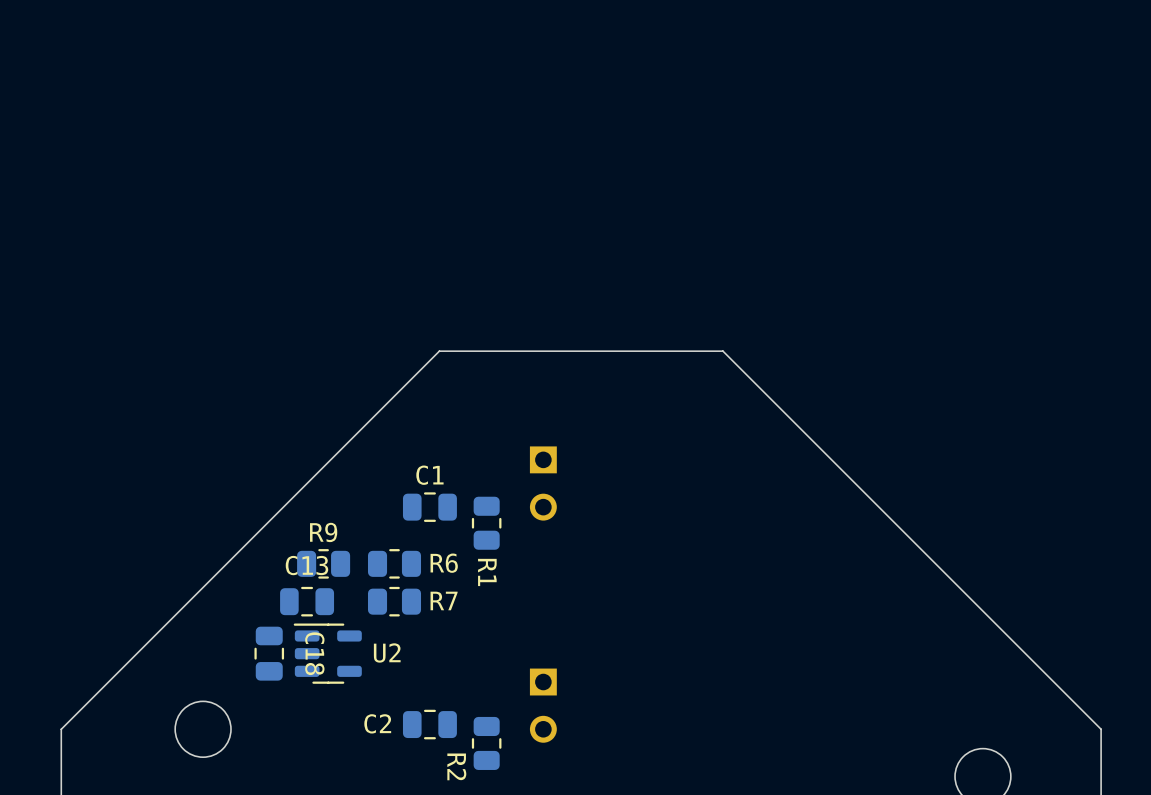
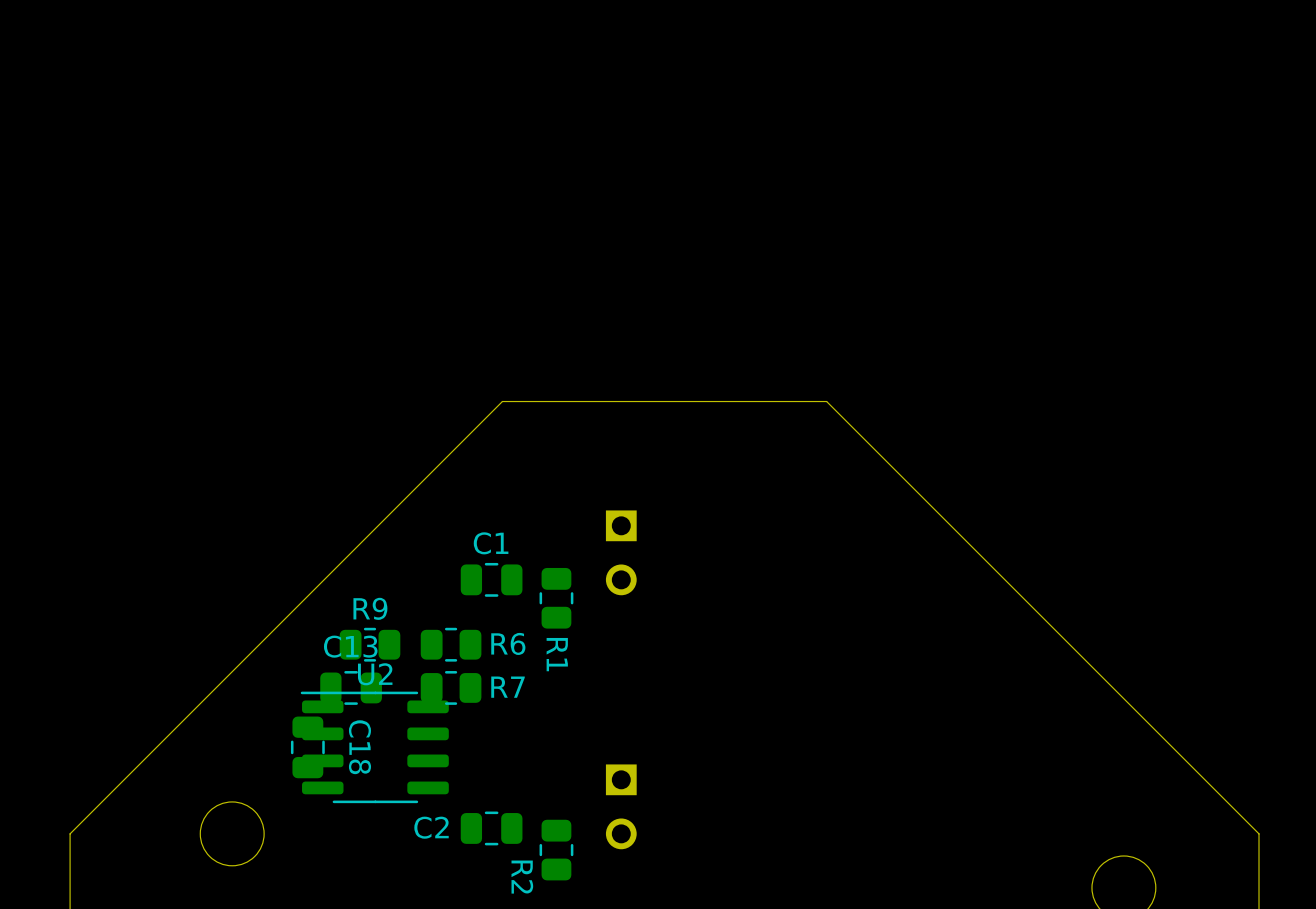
U2 footprint: [293, 623, 362, 684] -> [300, 691, 449, 804]
U2 name position: U2 (387, 652) -> U2 (375, 674)

